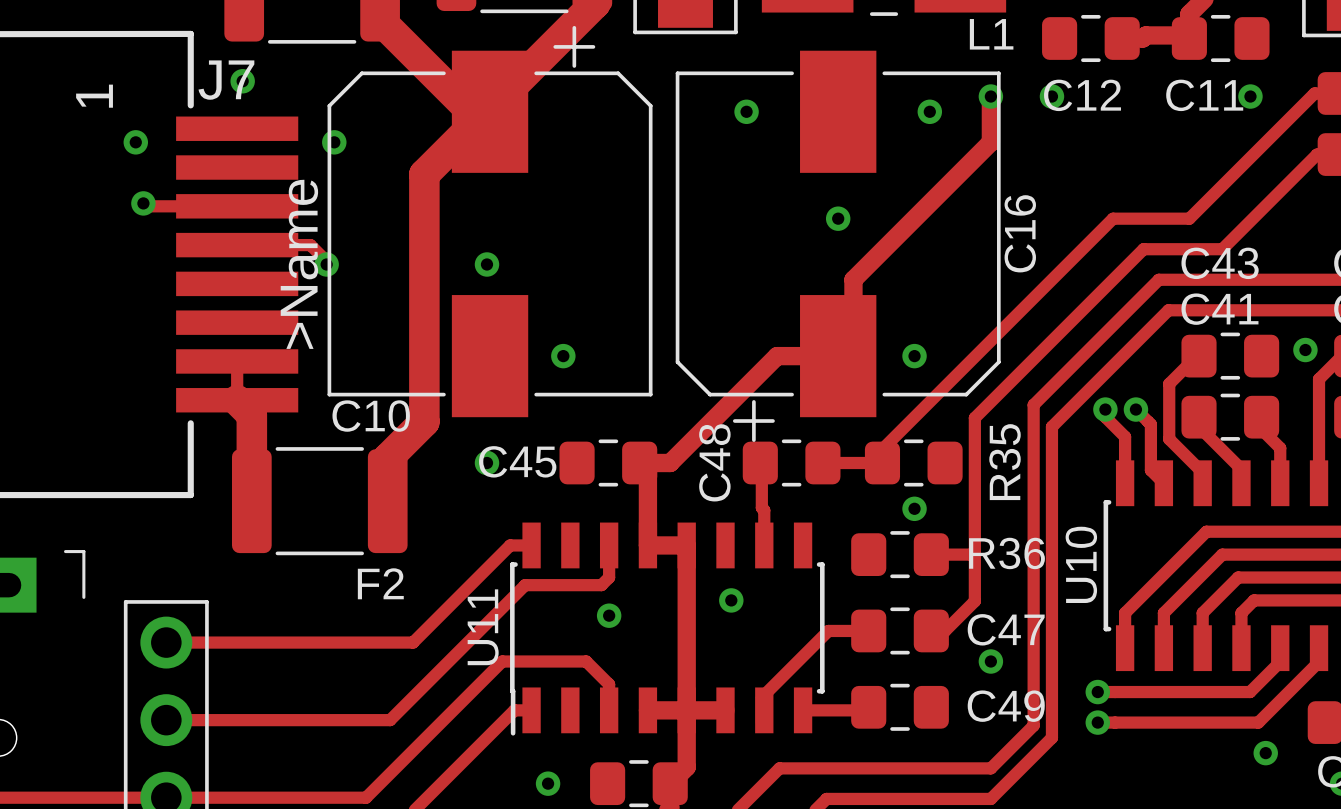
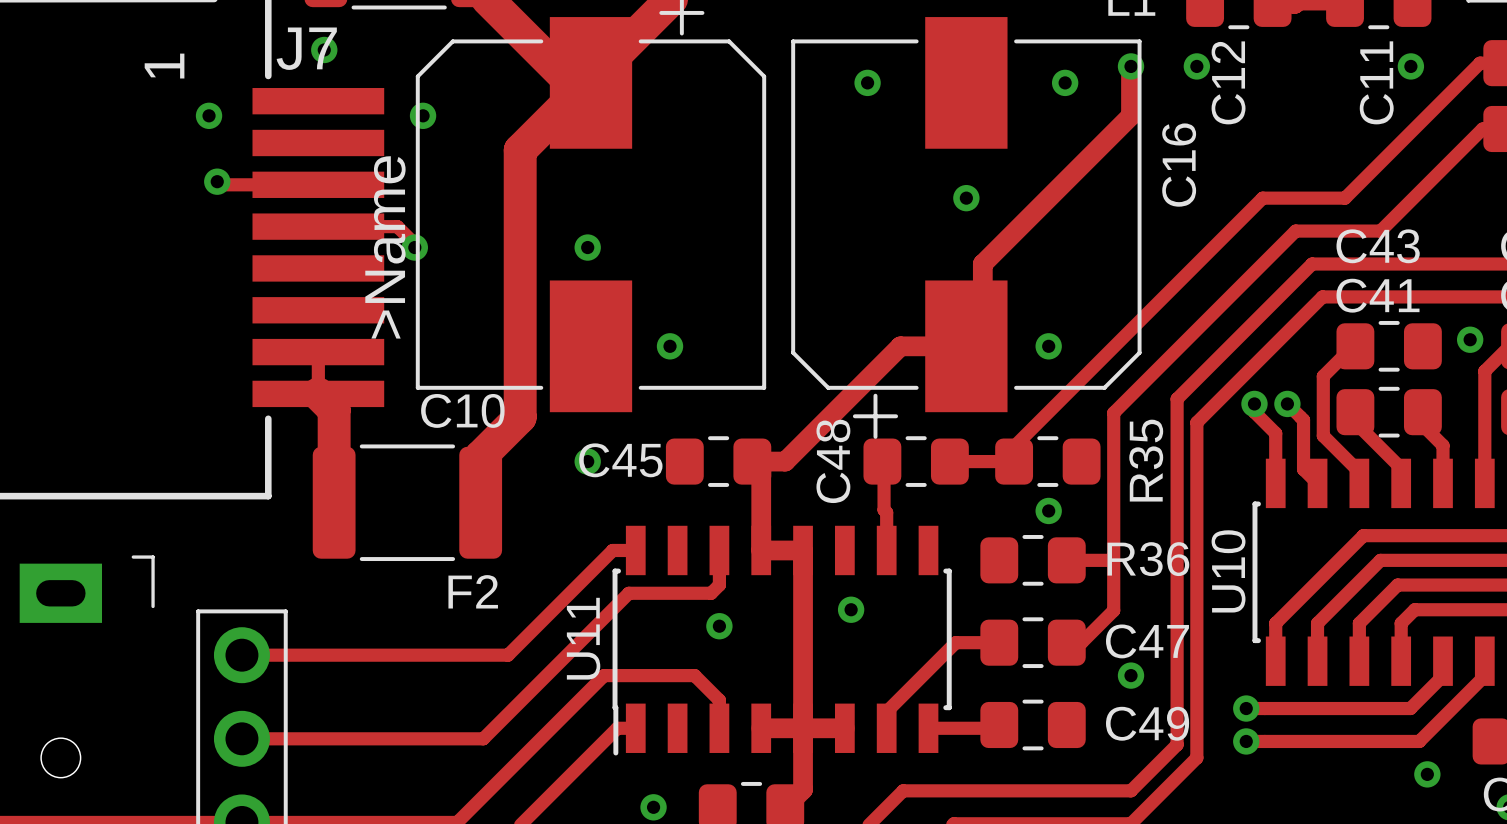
C12 name rotation: 0° (1082, 95) -> 90° counterclockwise (1228, 82)
C11 name rotation: 0° (1204, 95) -> 90° counterclockwise (1376, 82)
C16 name position: C16 (1020, 233) -> C16 (1179, 165)

